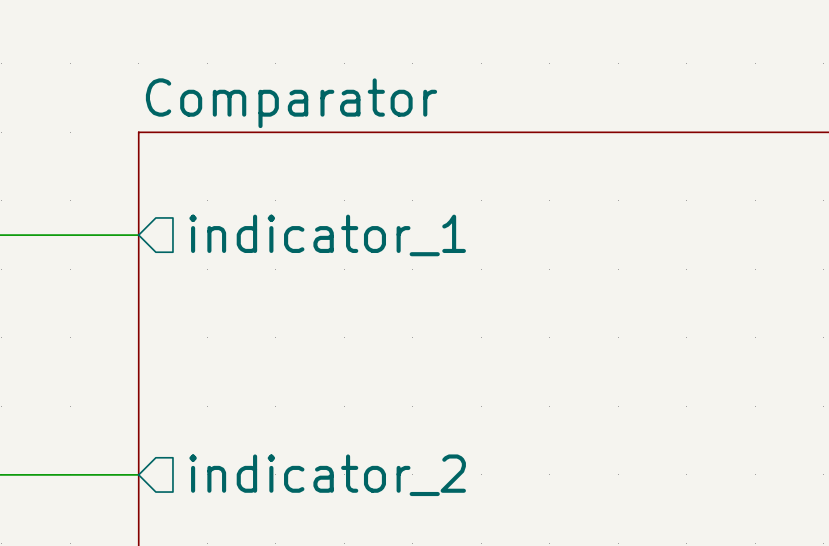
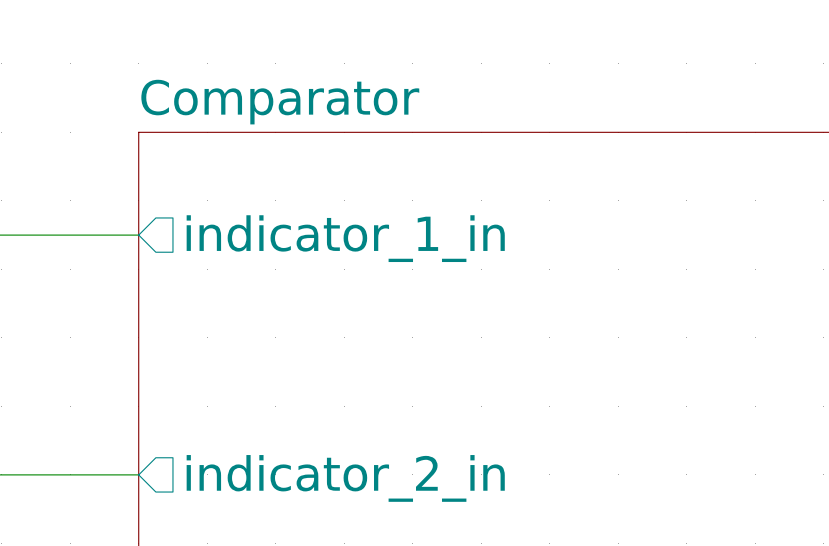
sheet pin: indicator_1 (327, 235) -> indicator_1_in (345, 238)
sheet pin: indicator_2 (327, 475) -> indicator_2_in (345, 478)

